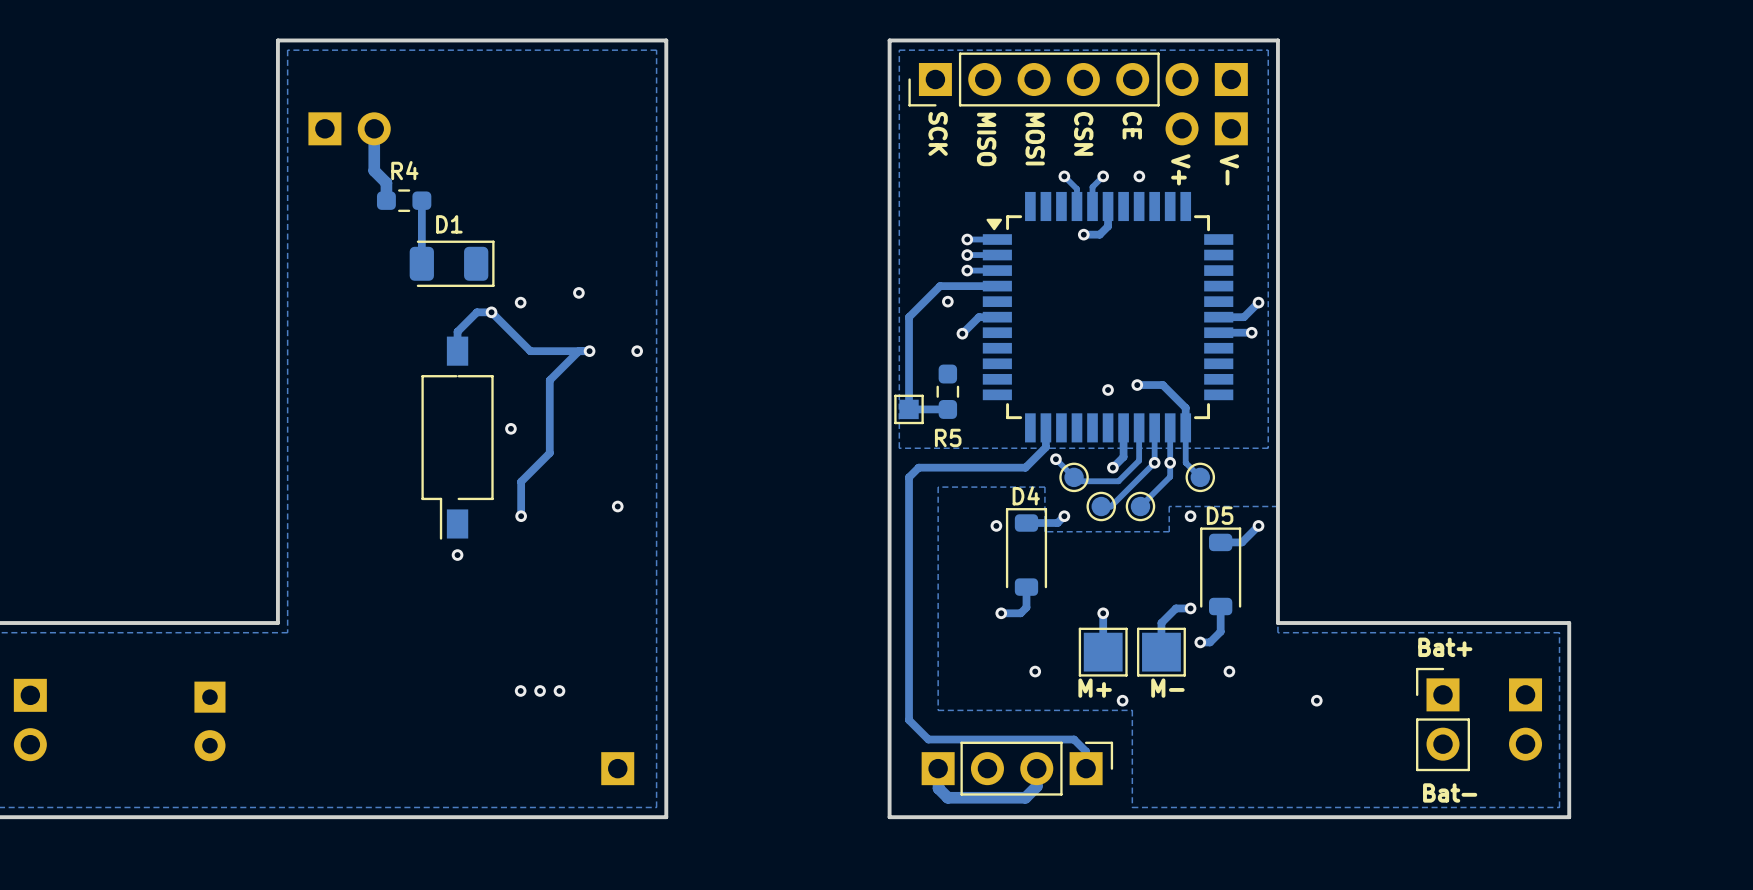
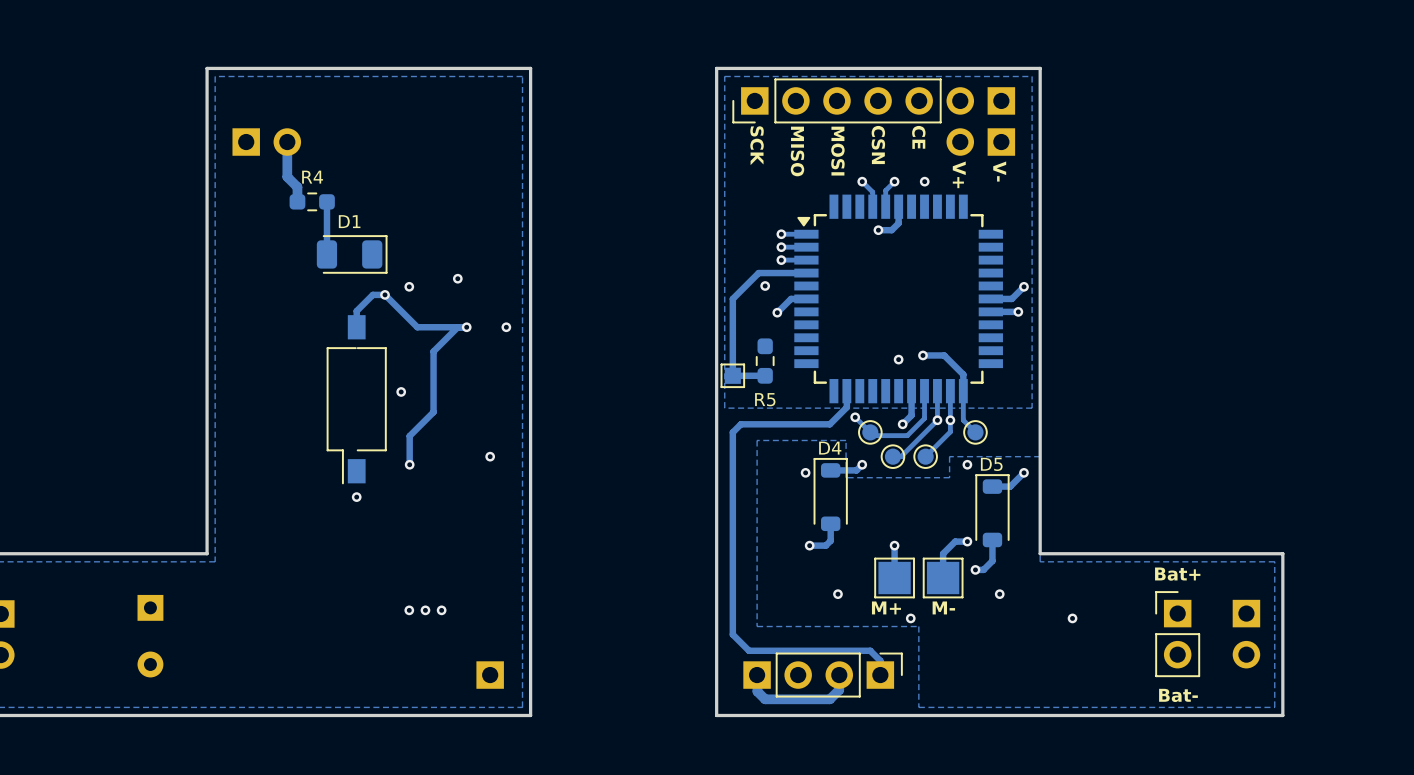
part footprint: [194, 681, 226, 762] -> [137, 594, 164, 678]

